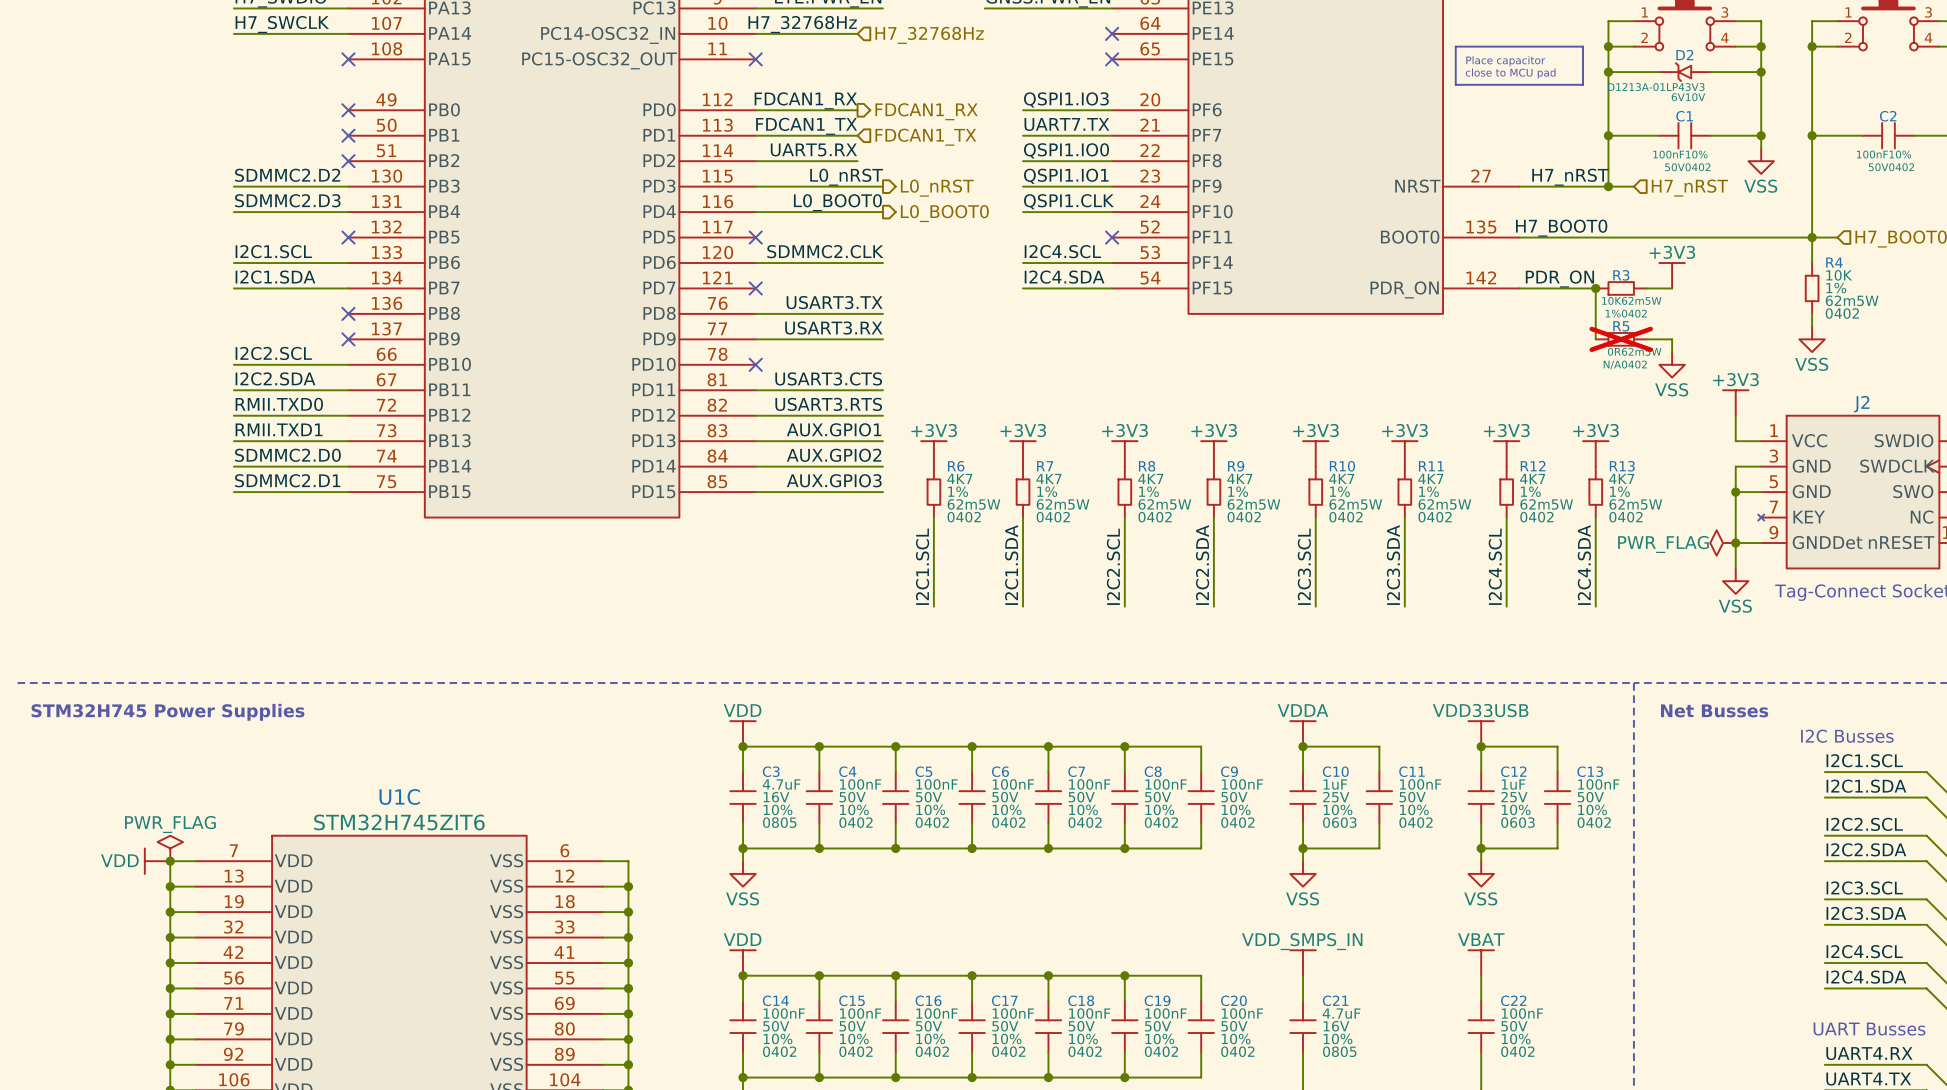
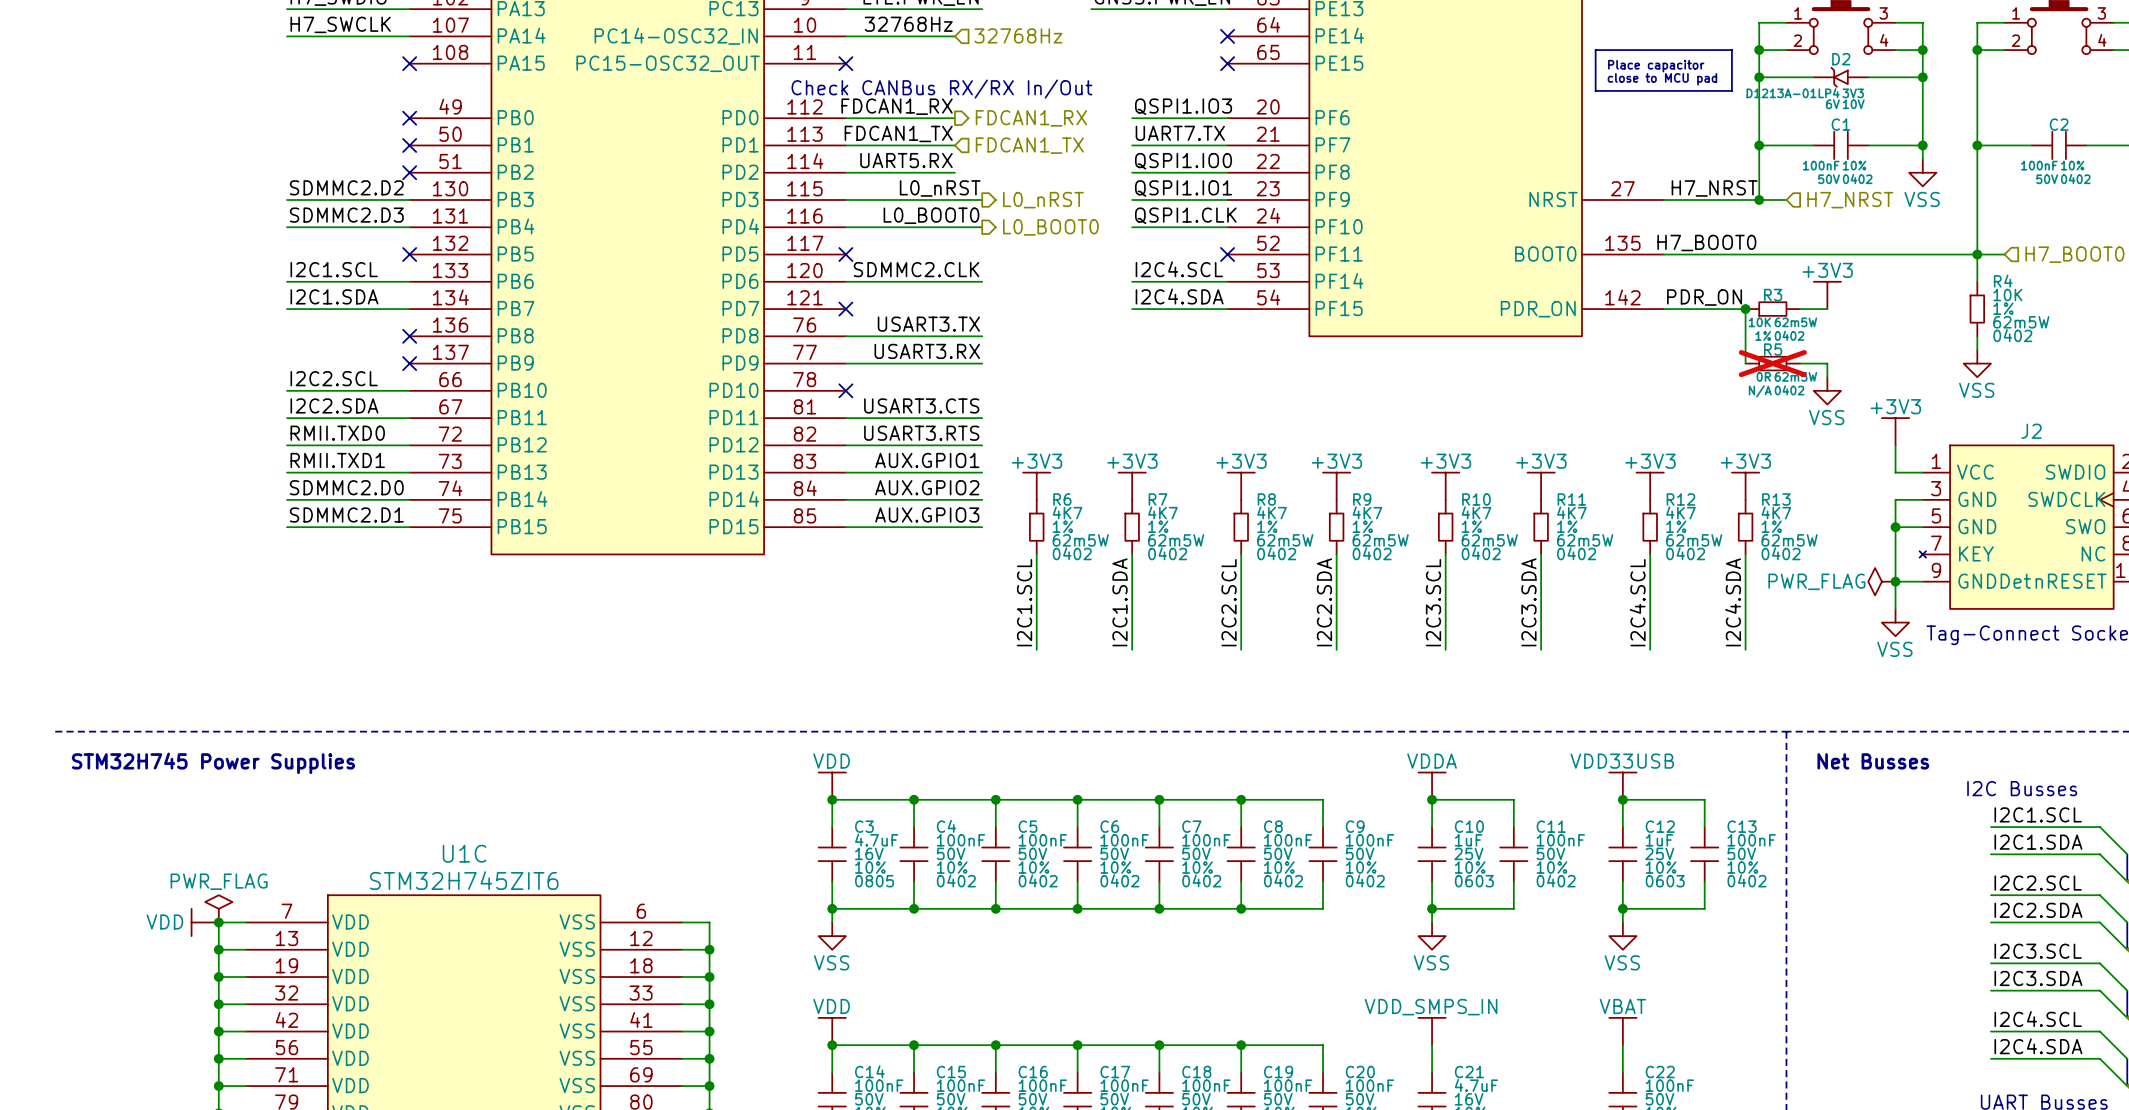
label: H7_32768Hz (802, 24) -> 32768Hz (908, 24)
hierarchical label: H7_32768Hz (929, 35) -> 32768Hz (1018, 35)
text: none -> Check CANBus RX/RX In/Out (941, 89)
label: H7_nRST (1570, 177) -> H7_NRST (1714, 188)
hierarchical label: H7_nRST (1689, 188) -> H7_NRST (1850, 200)

